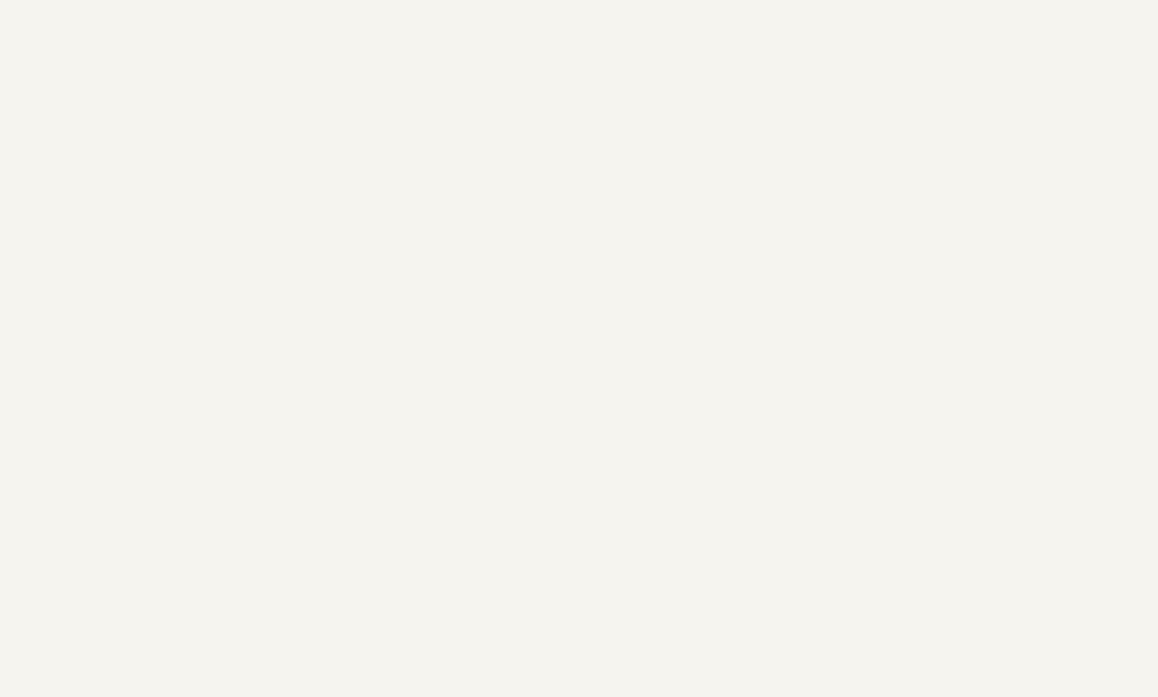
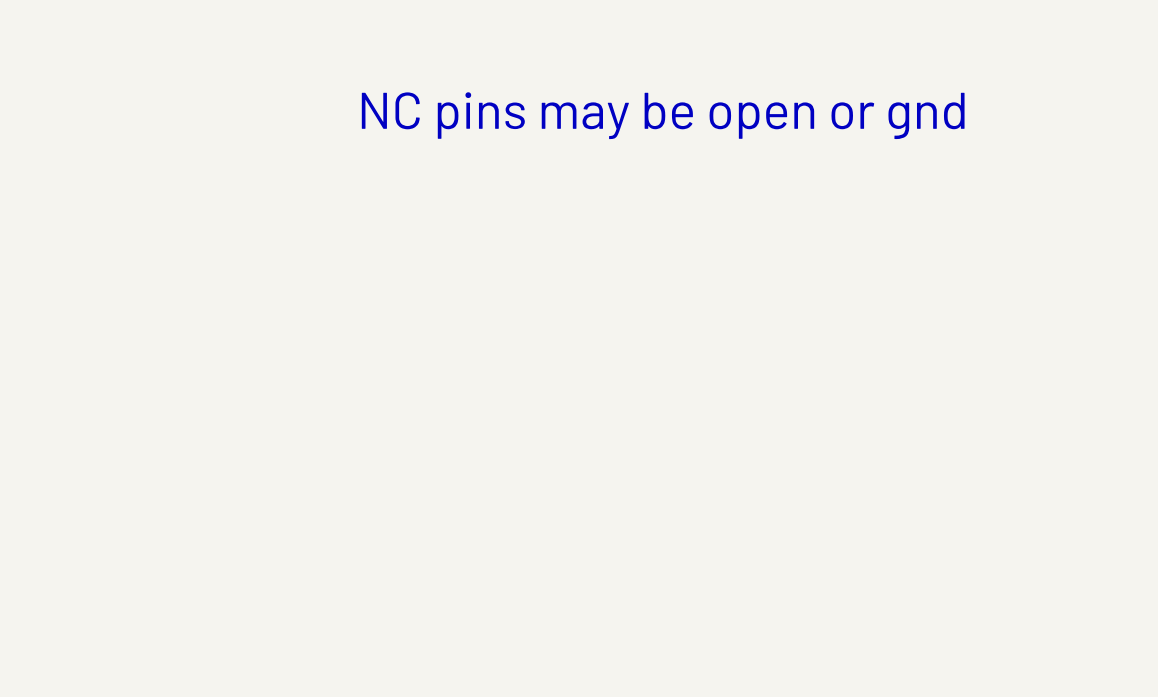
text: none -> NC pins may be open or gnd (663, 115)

